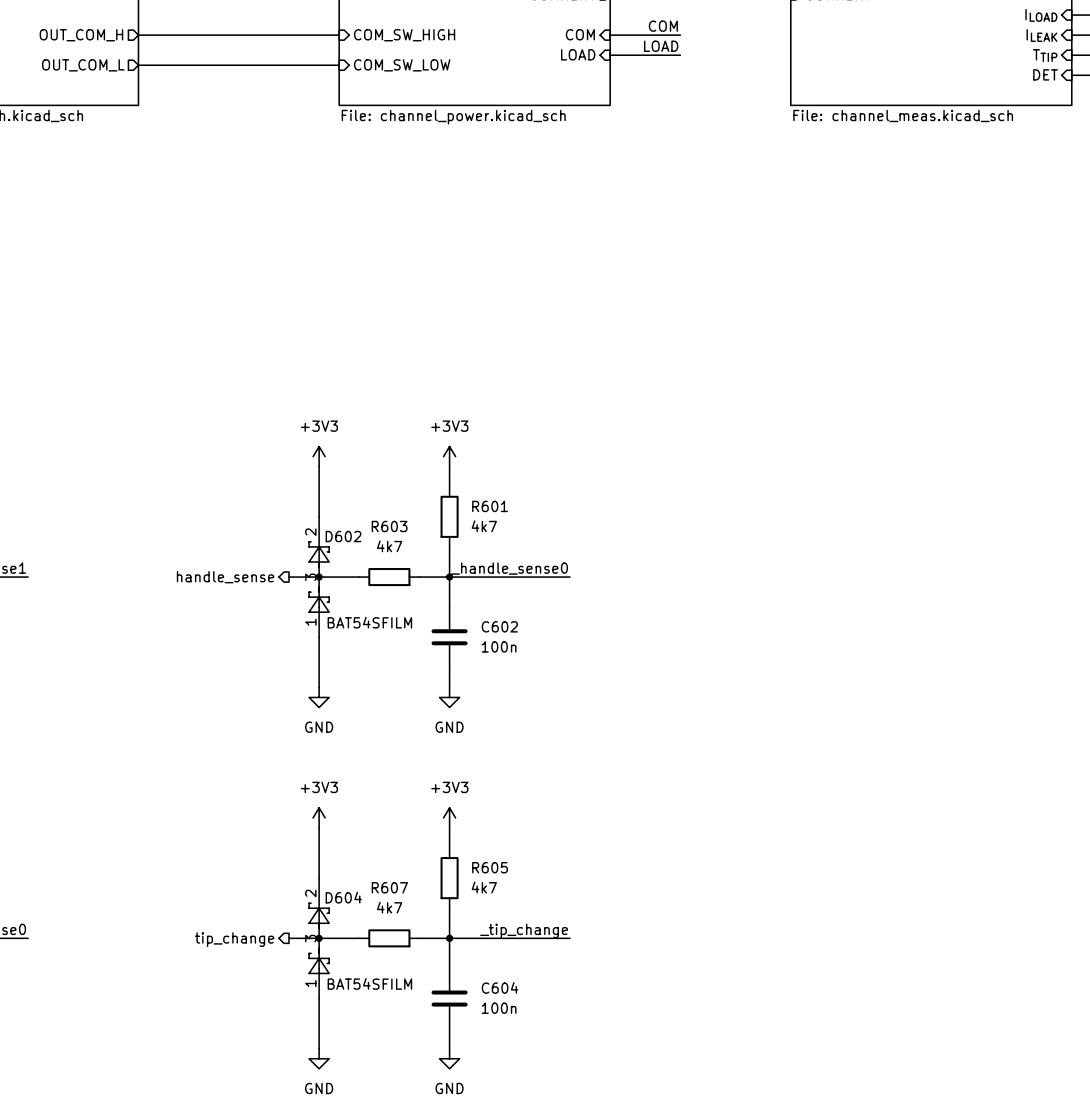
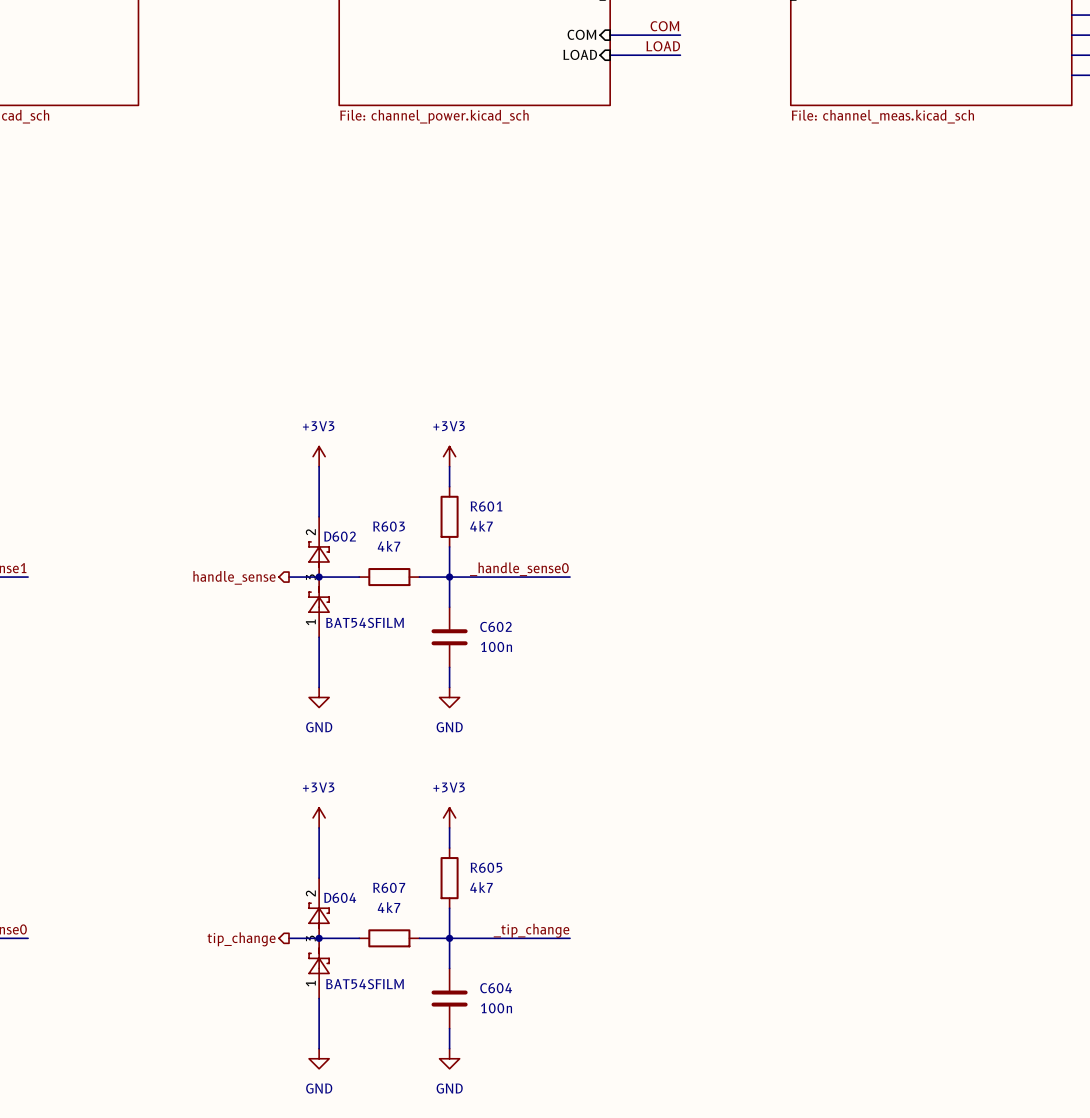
sheet pin: ILOAD (1041, 15) -> none
sheet pin: OUT_COM_H (81, 35) -> none
wire: (138, 35) (339, 35) -> none
sheet pin: COM_SW_HIGH (404, 35) -> none
sheet pin: ILEAK (1041, 35) -> none
sheet pin: TTIP (1045, 55) -> none
sheet pin: OUT_COM_L (83, 65) -> none
wire: (138, 65) (339, 65) -> none
sheet pin: COM_SW_LOW (402, 65) -> none
sheet pin: DET (1045, 74) -> none

